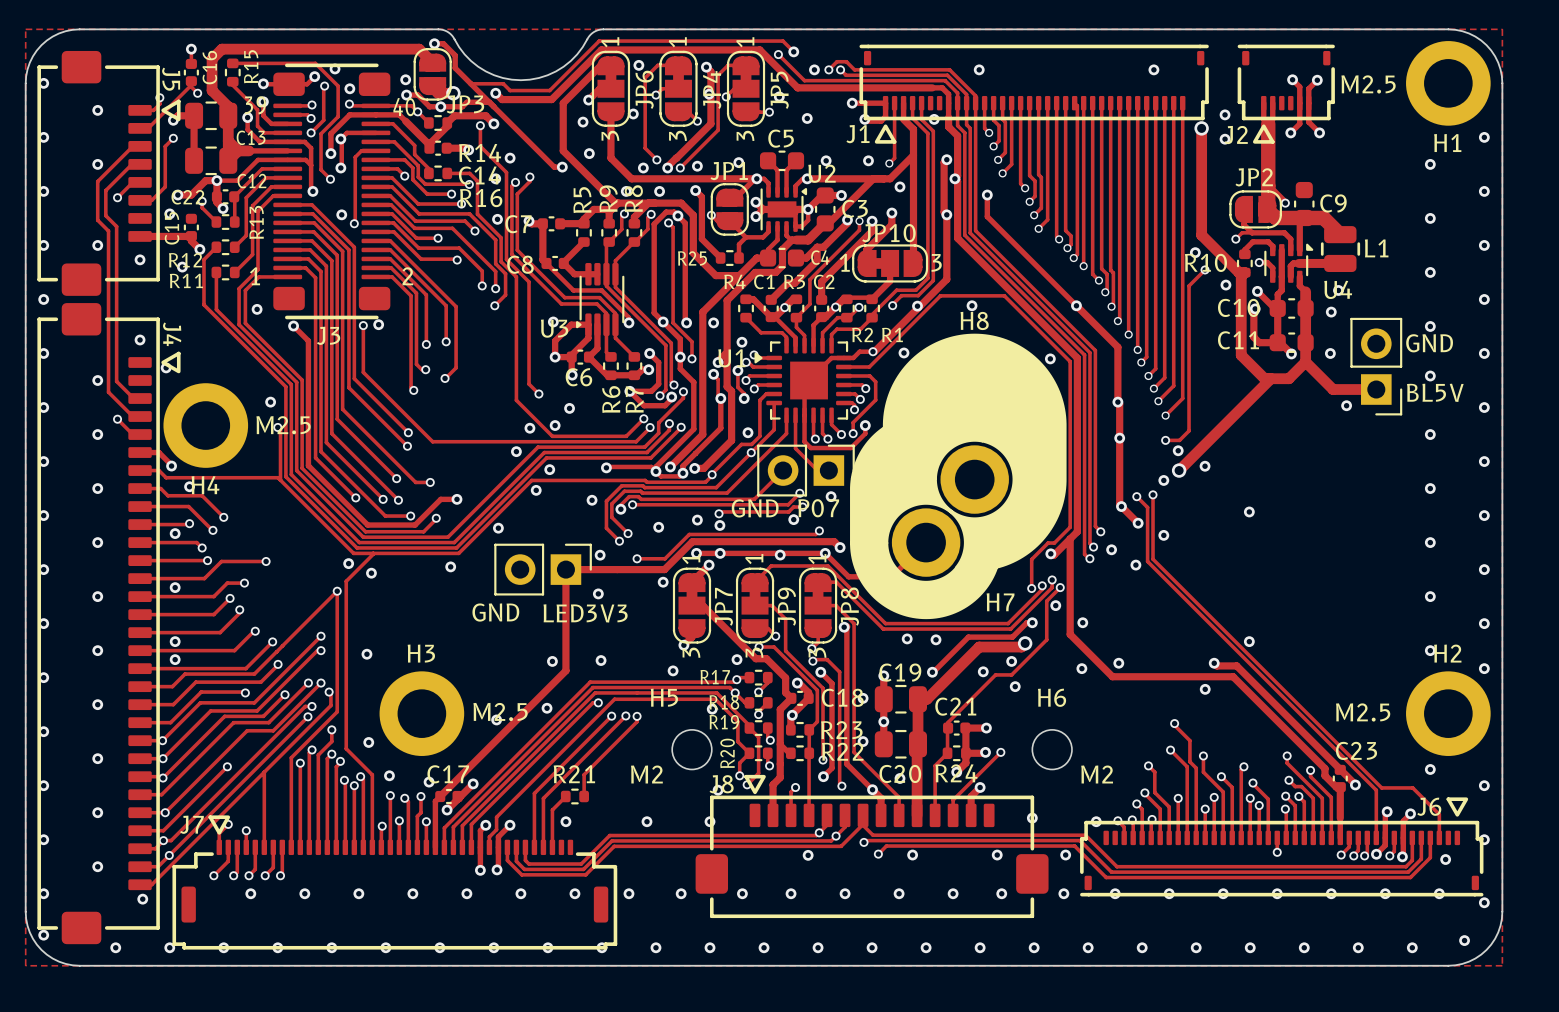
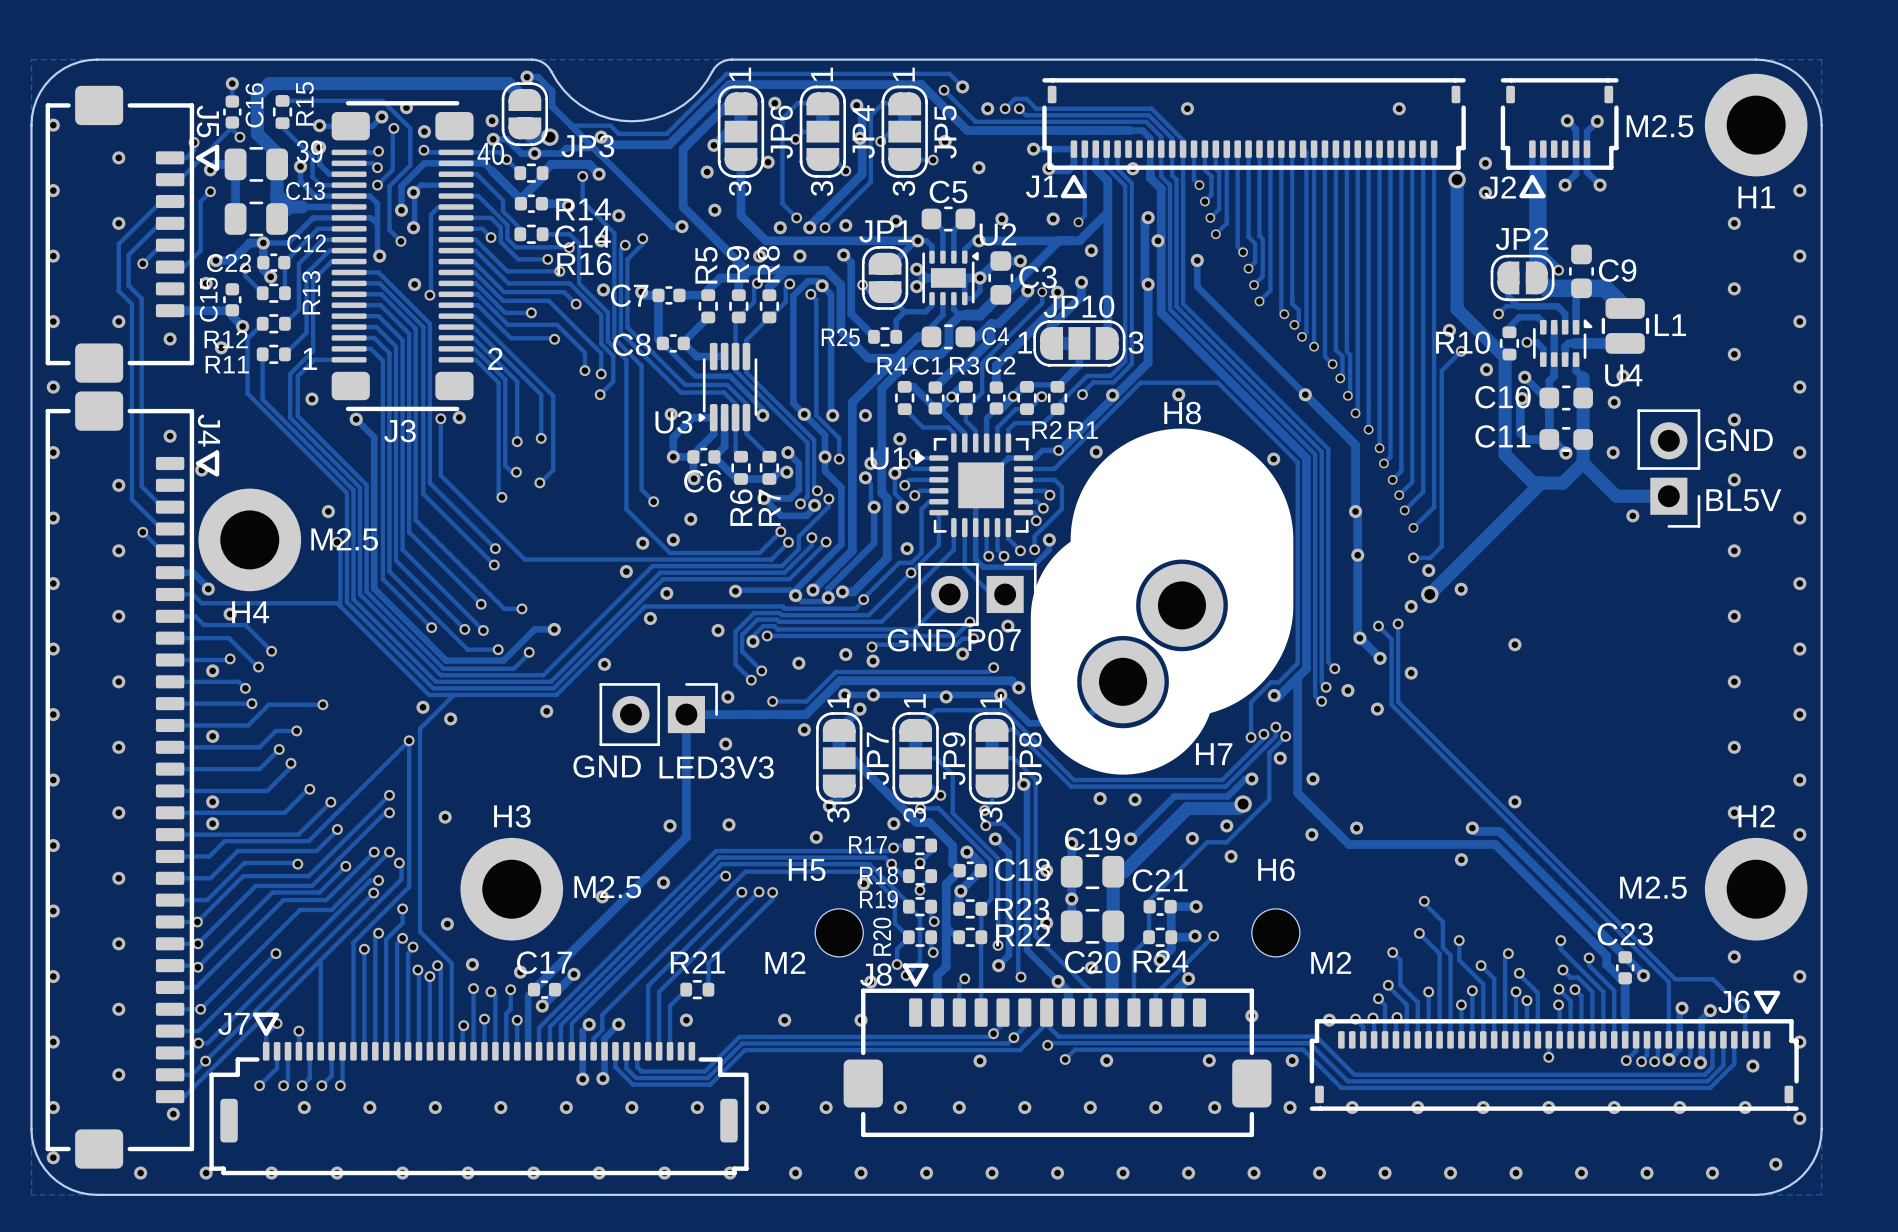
JP3 name position: JP3 (465, 104) -> JP3 (587, 146)
C23 name position: C23 (1356, 750) -> C23 (1625, 934)

